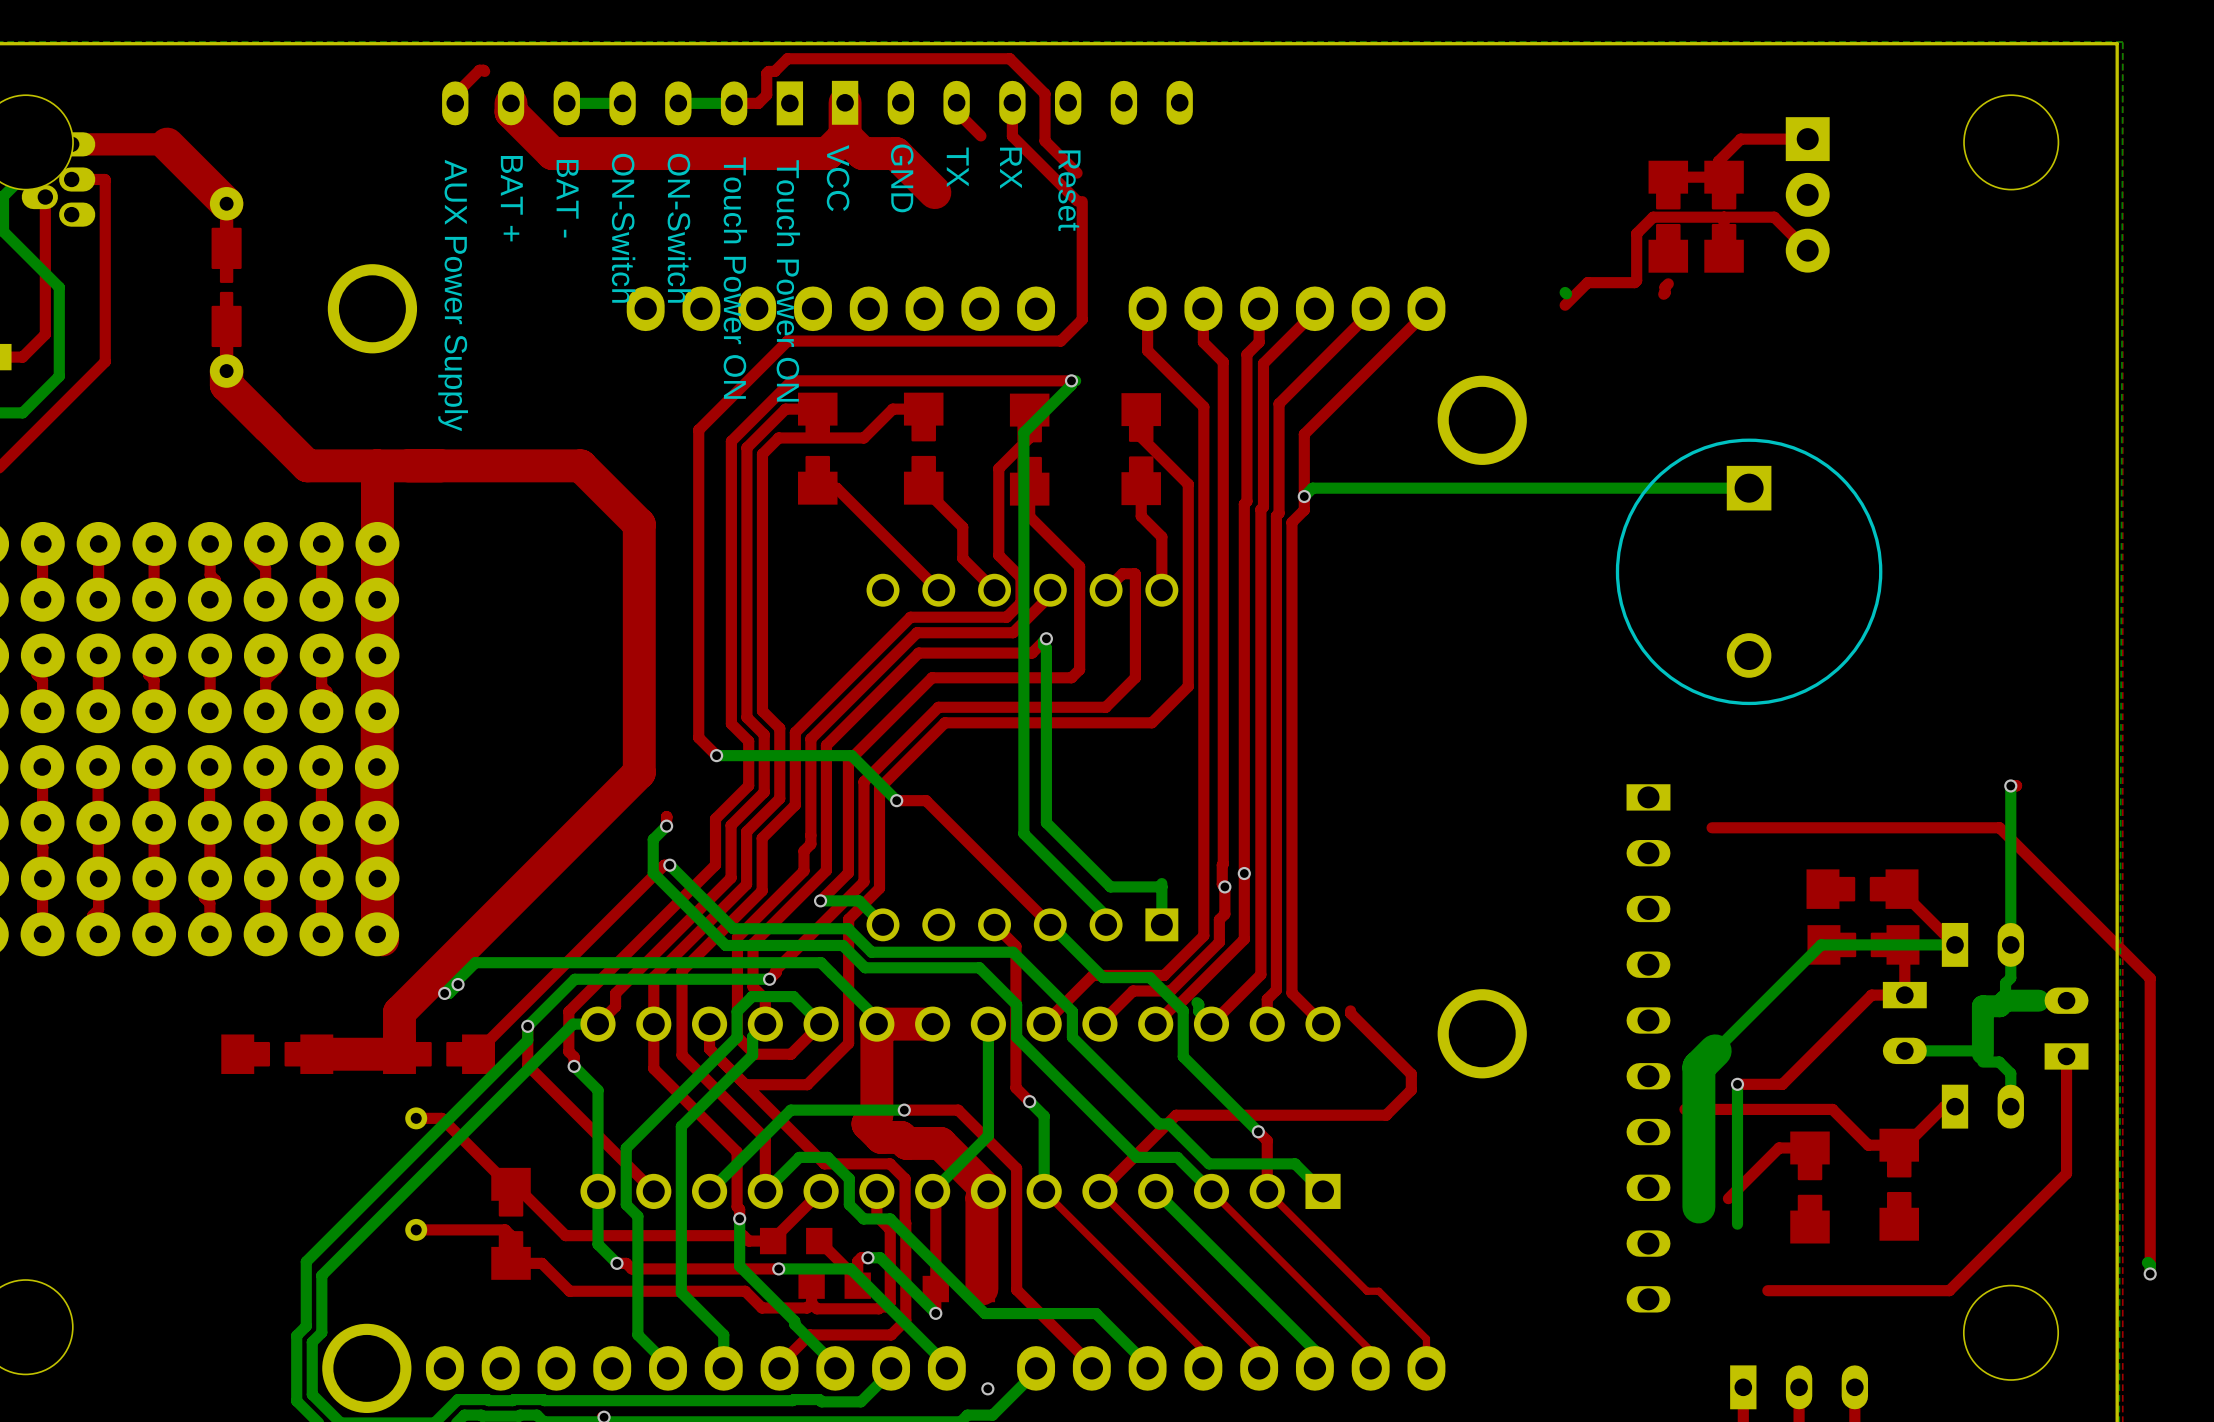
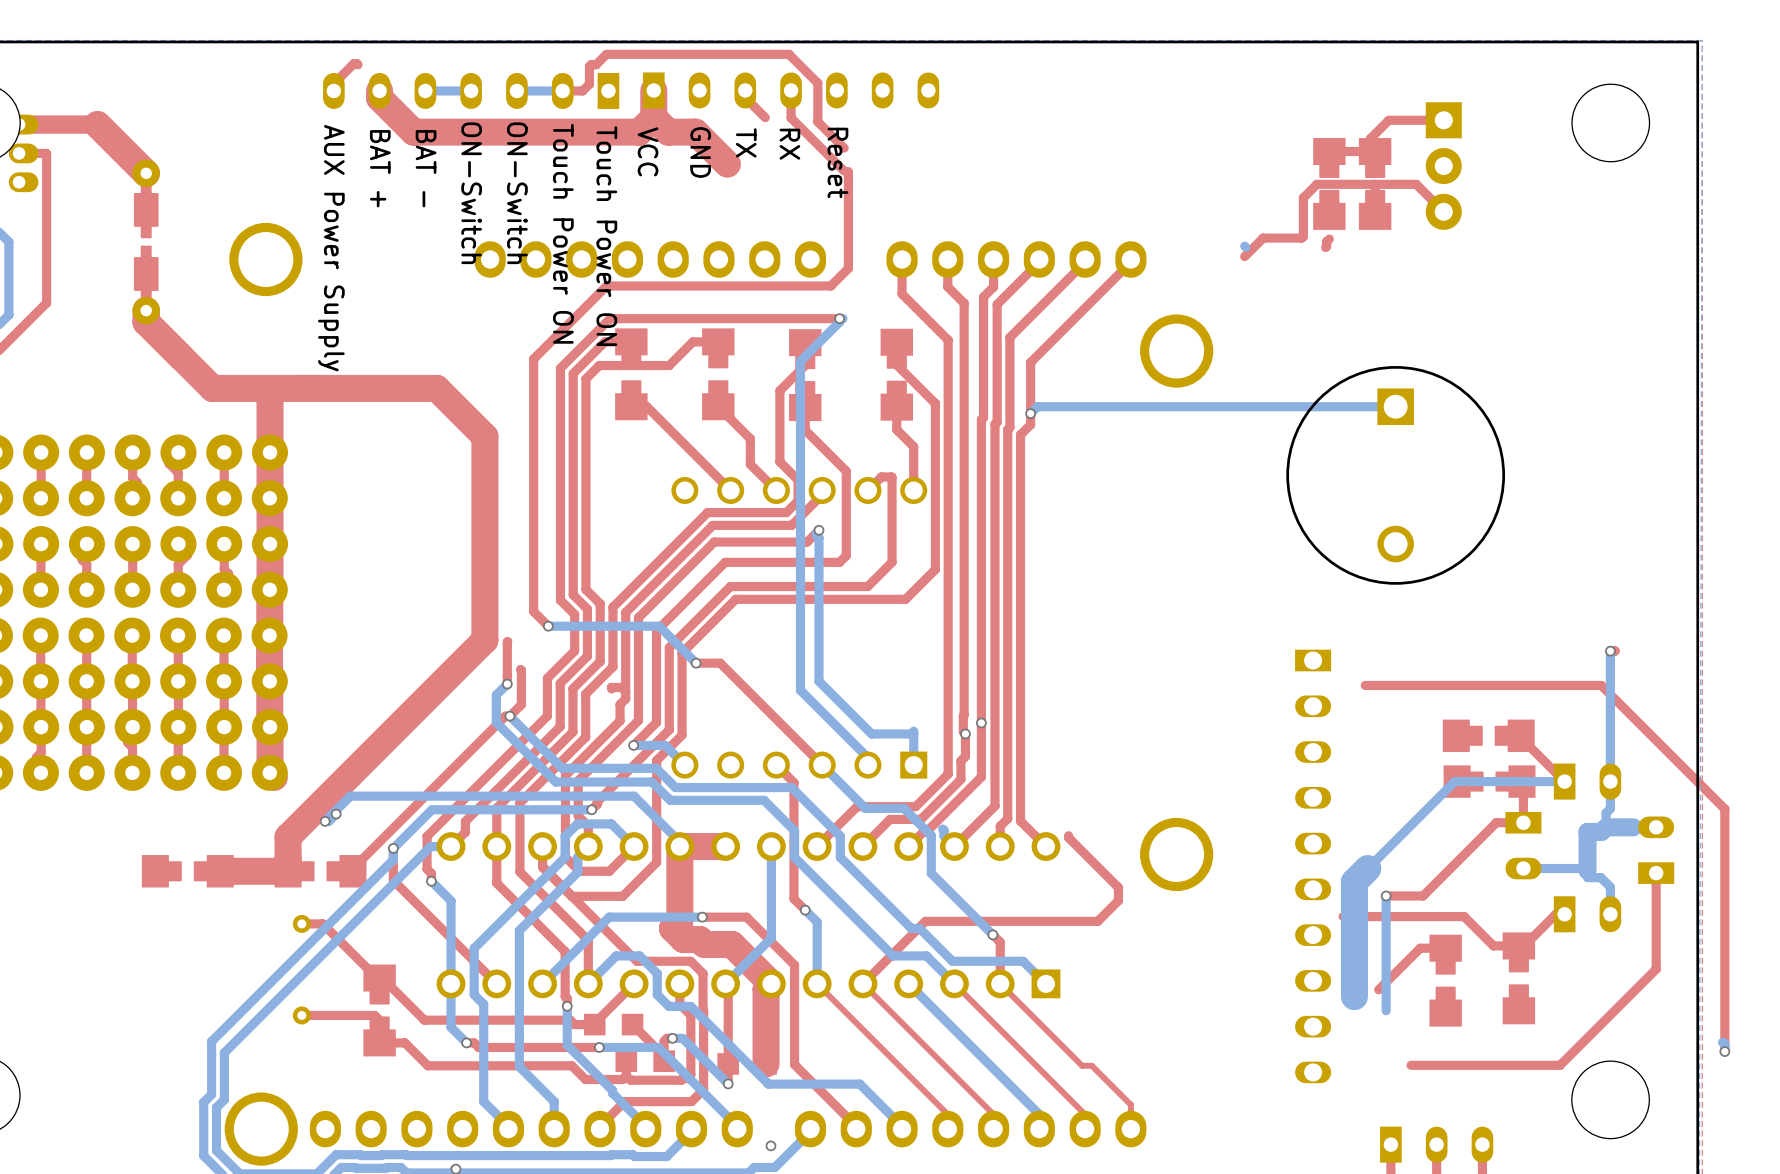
top track: none -> (507, 641) (507, 676)
top track: none -> (520, 669) (521, 704) (509, 716)
top track: none -> (611, 688) (621, 687) (625, 691)

